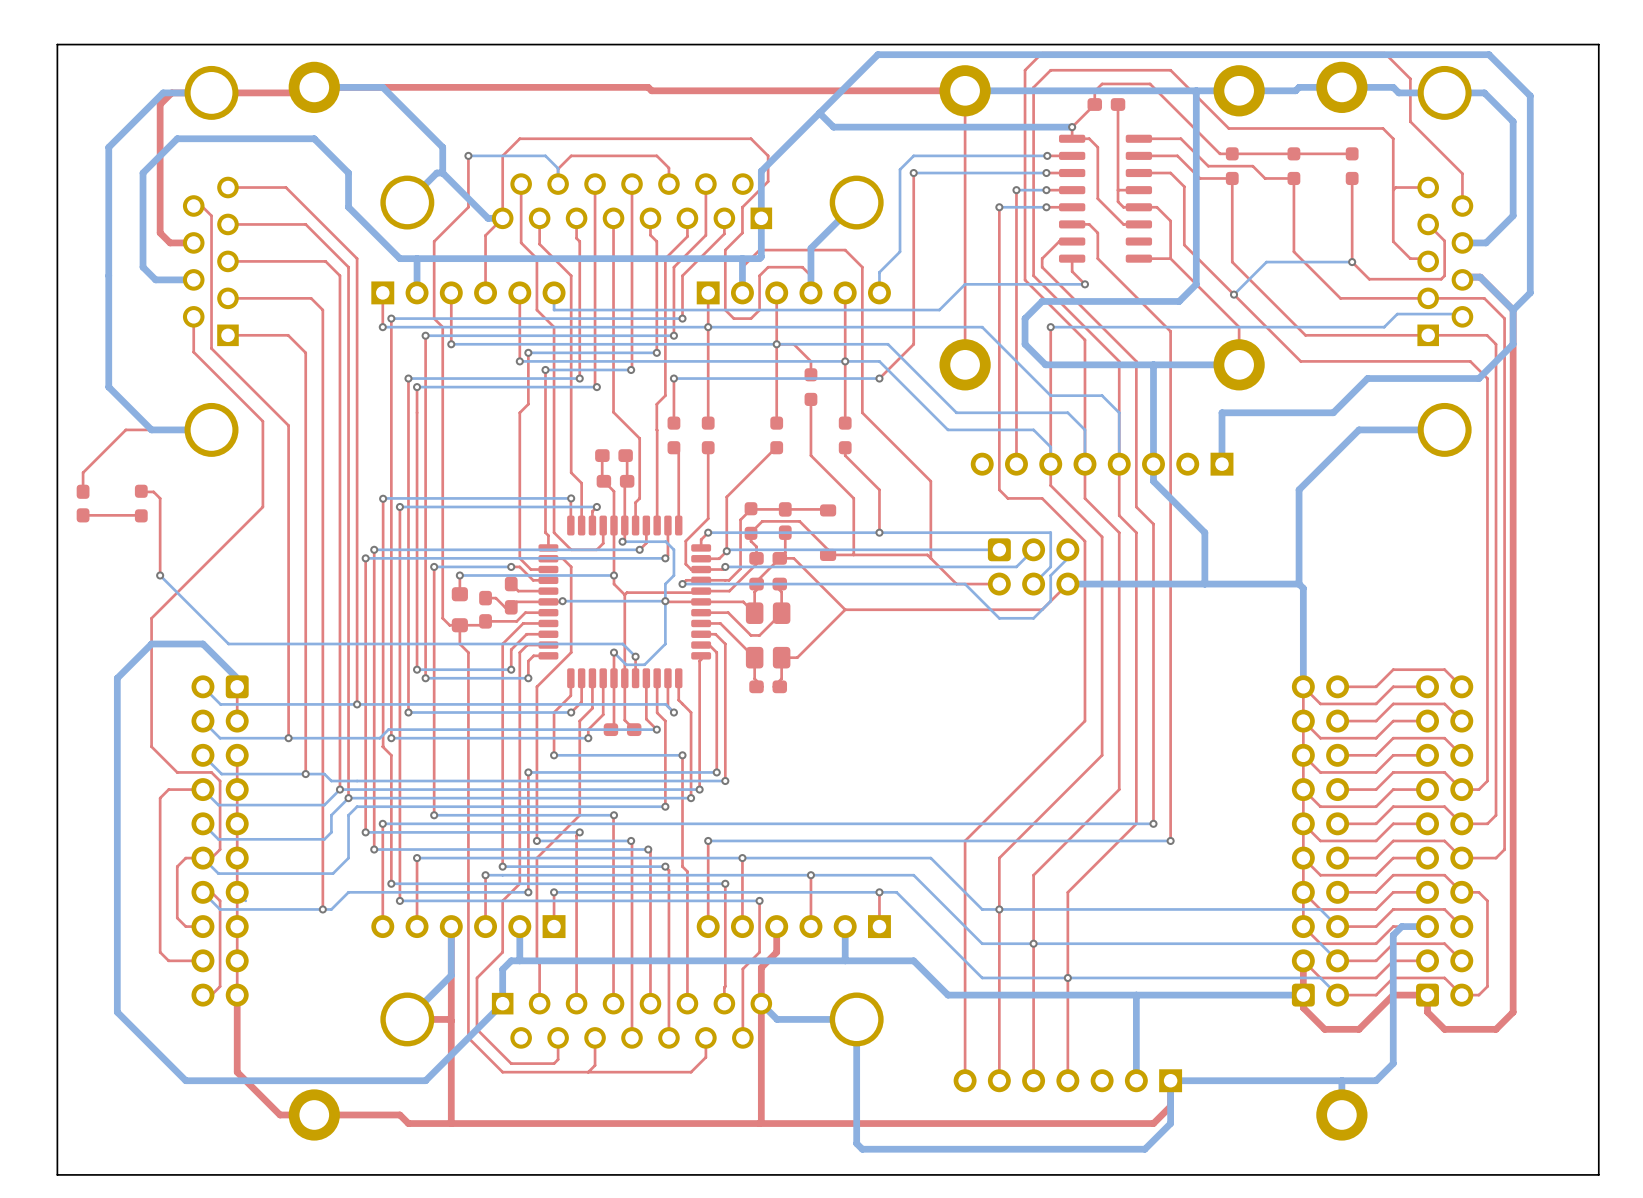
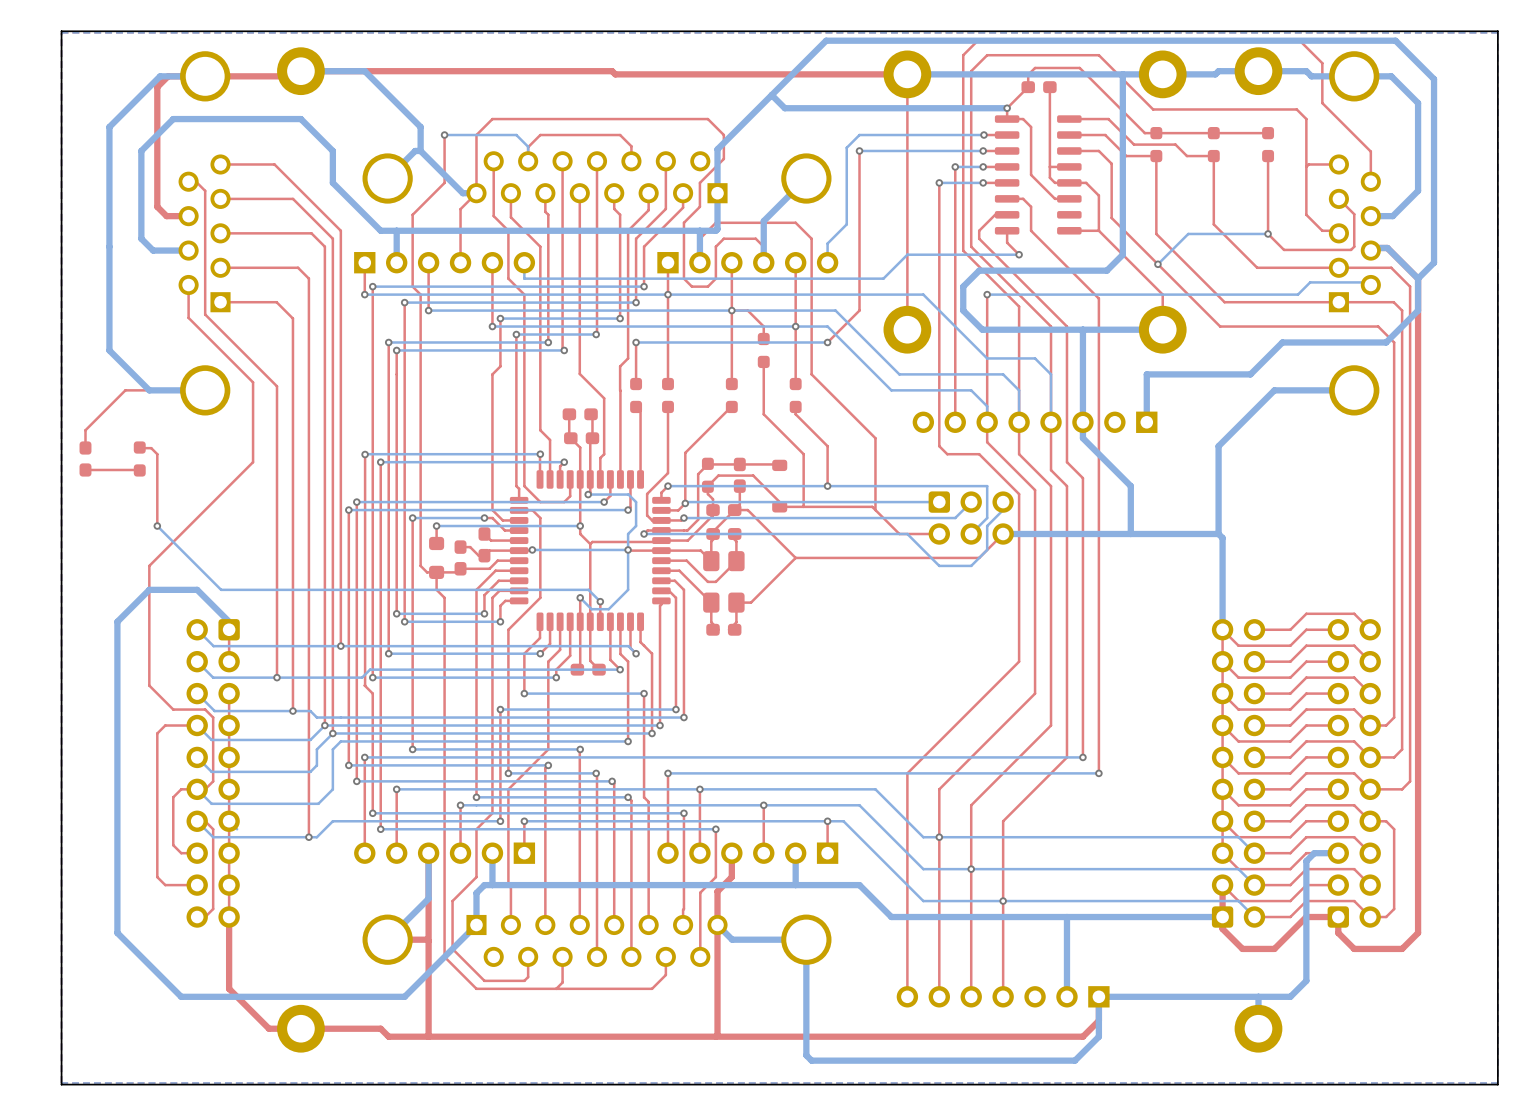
bottom zone outline: none -> (1497, 32) (1497, 1082) (61, 1082) (61, 32) (1497, 32)

